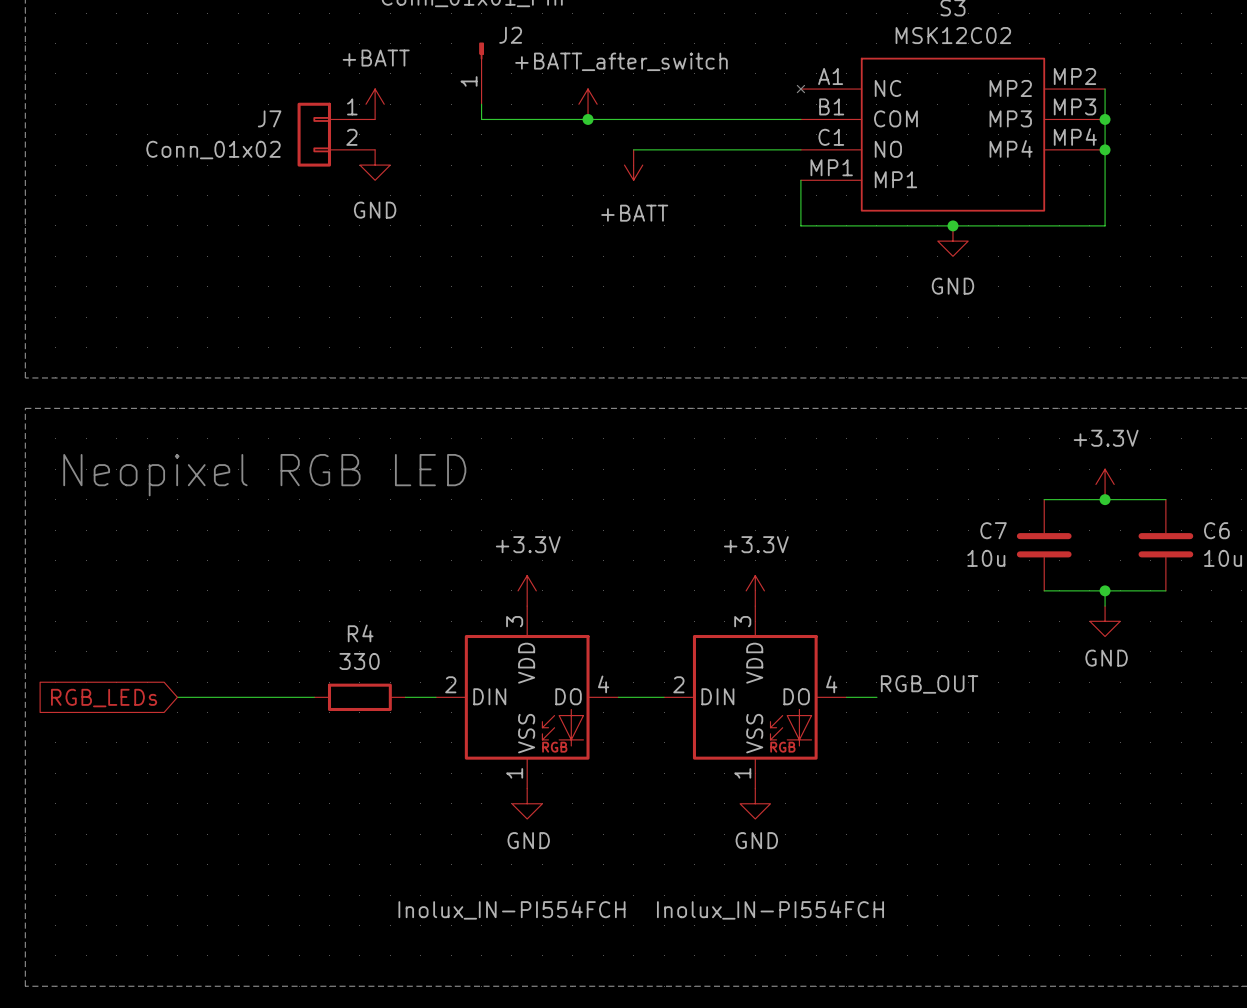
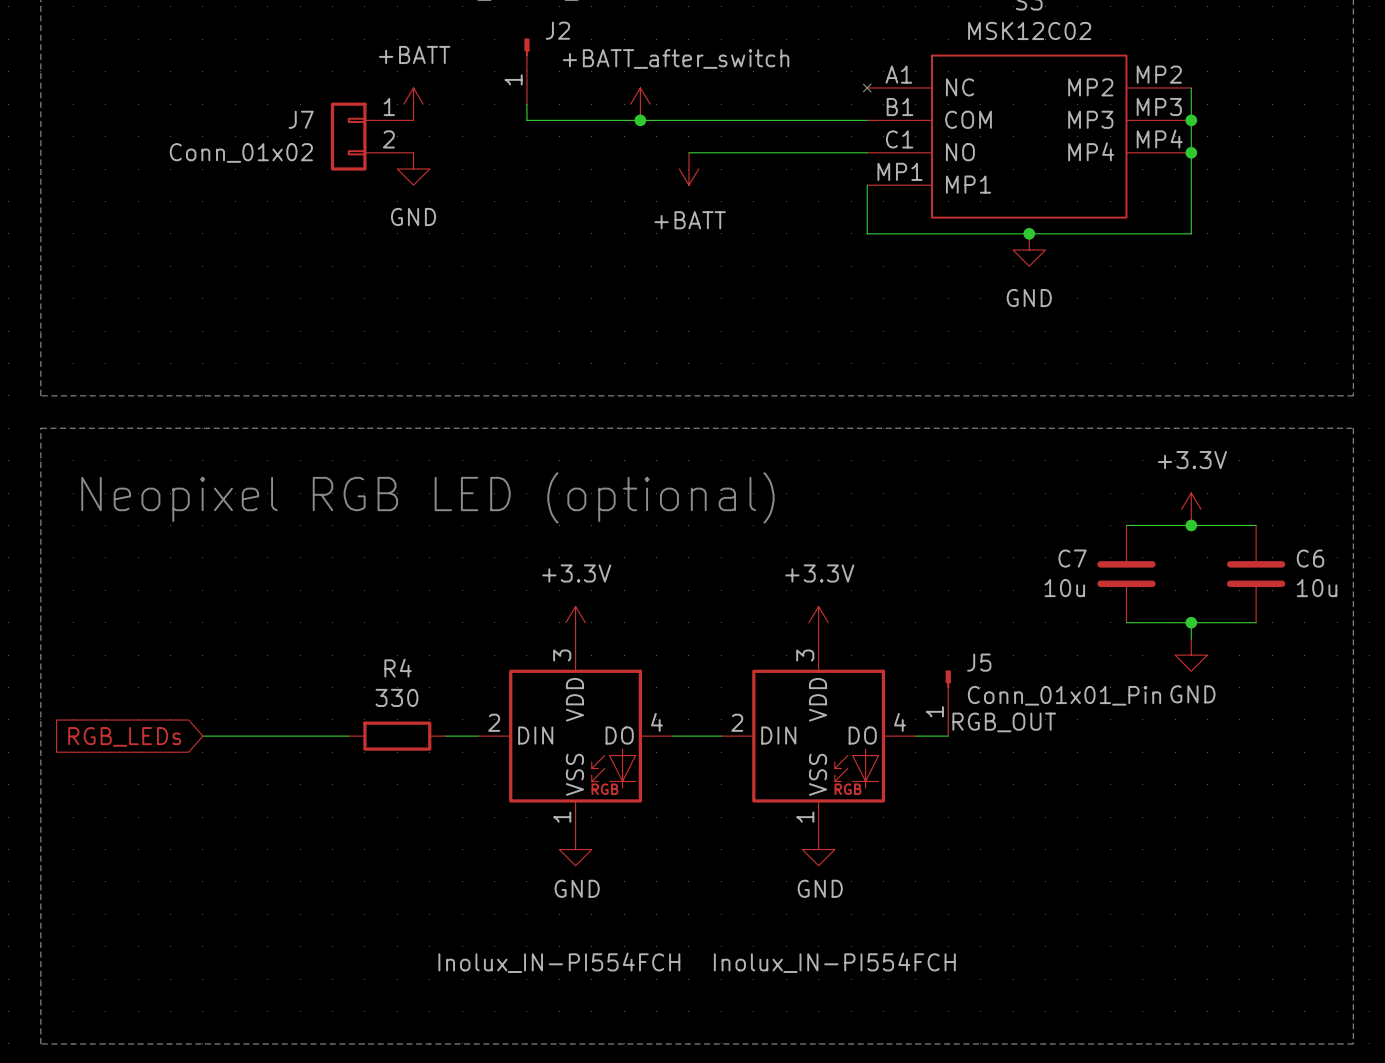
text: Neopixel RGB LED (264, 475) -> Neopixel RGB LED (optional) (427, 497)
J5: none -> Conn_01x01_Pin (948, 703)

